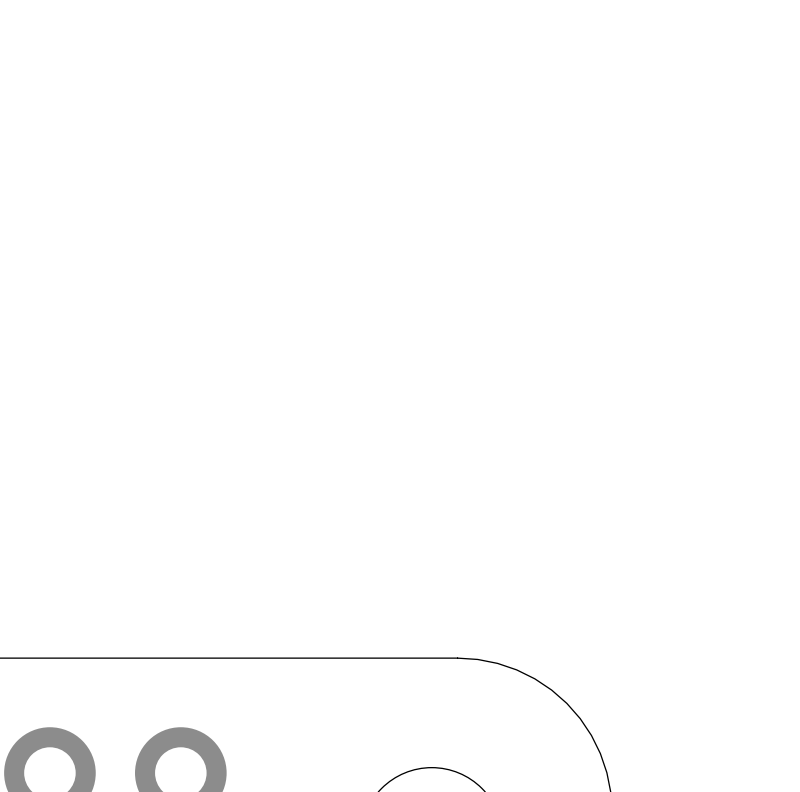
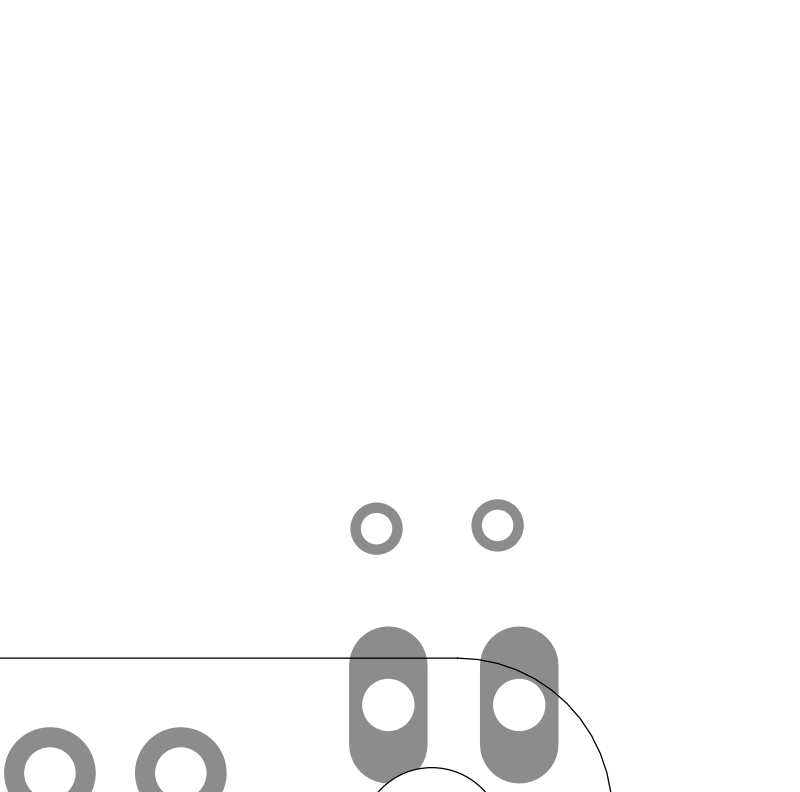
via: none -> (497, 525)
via: none -> (376, 528)
part: none -> (453, 704)

